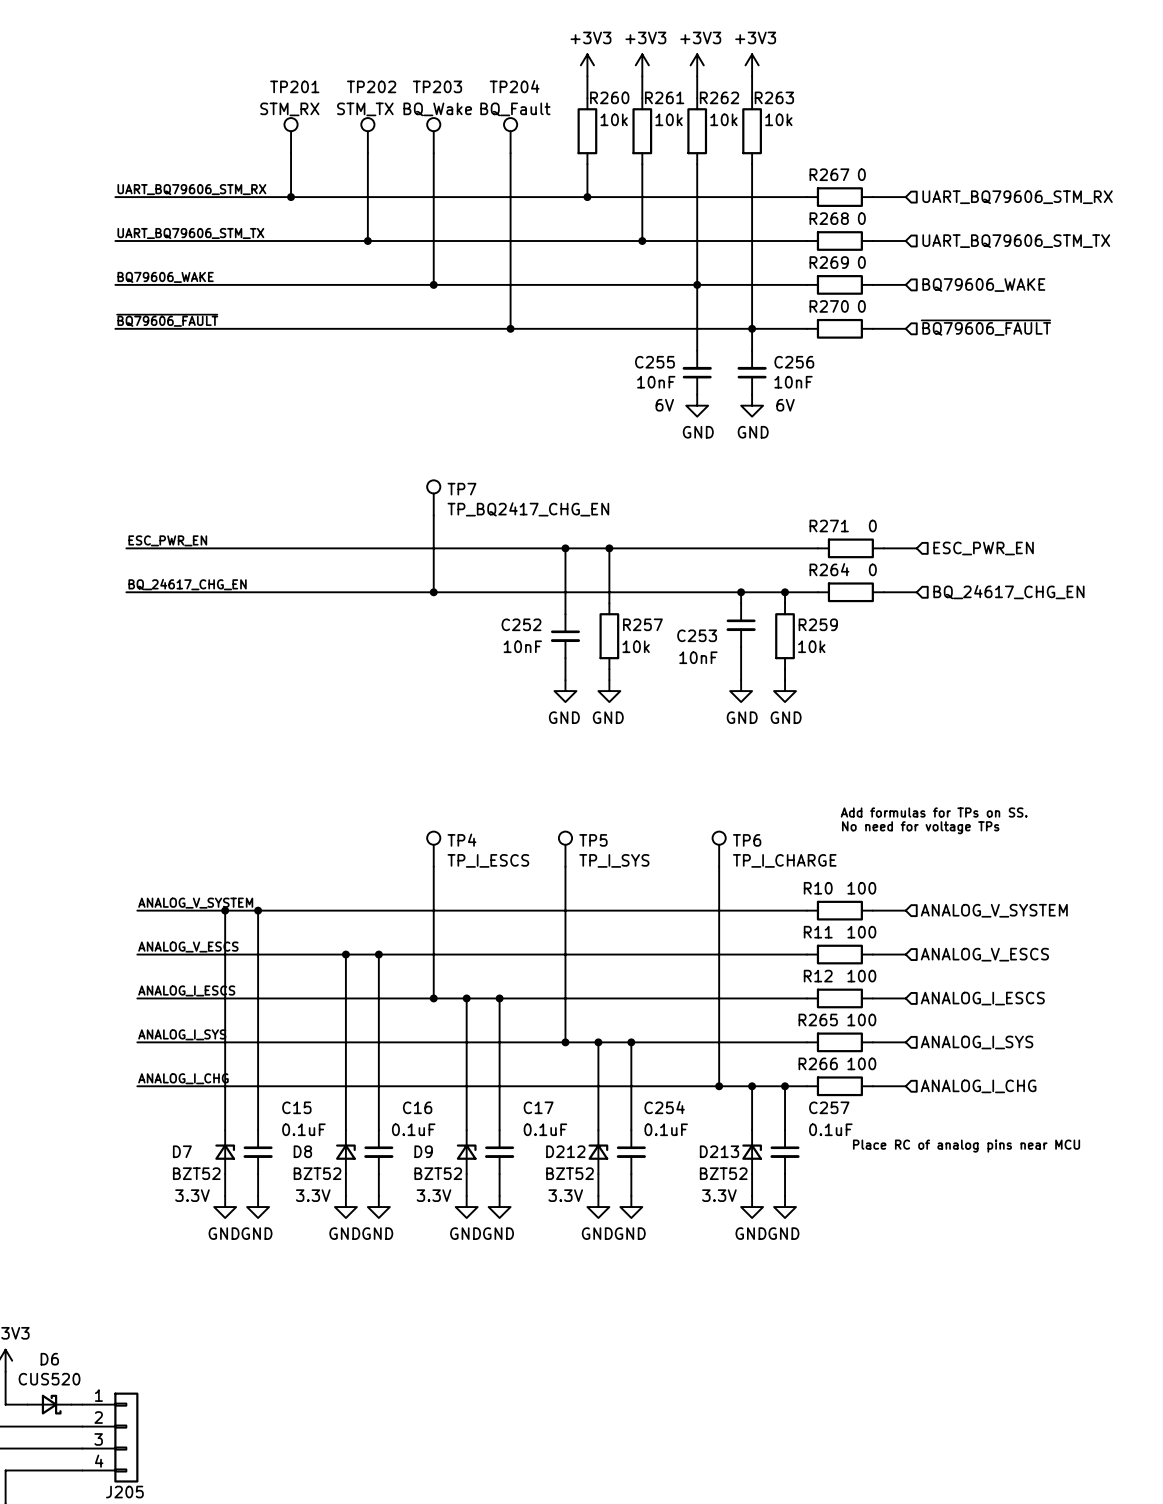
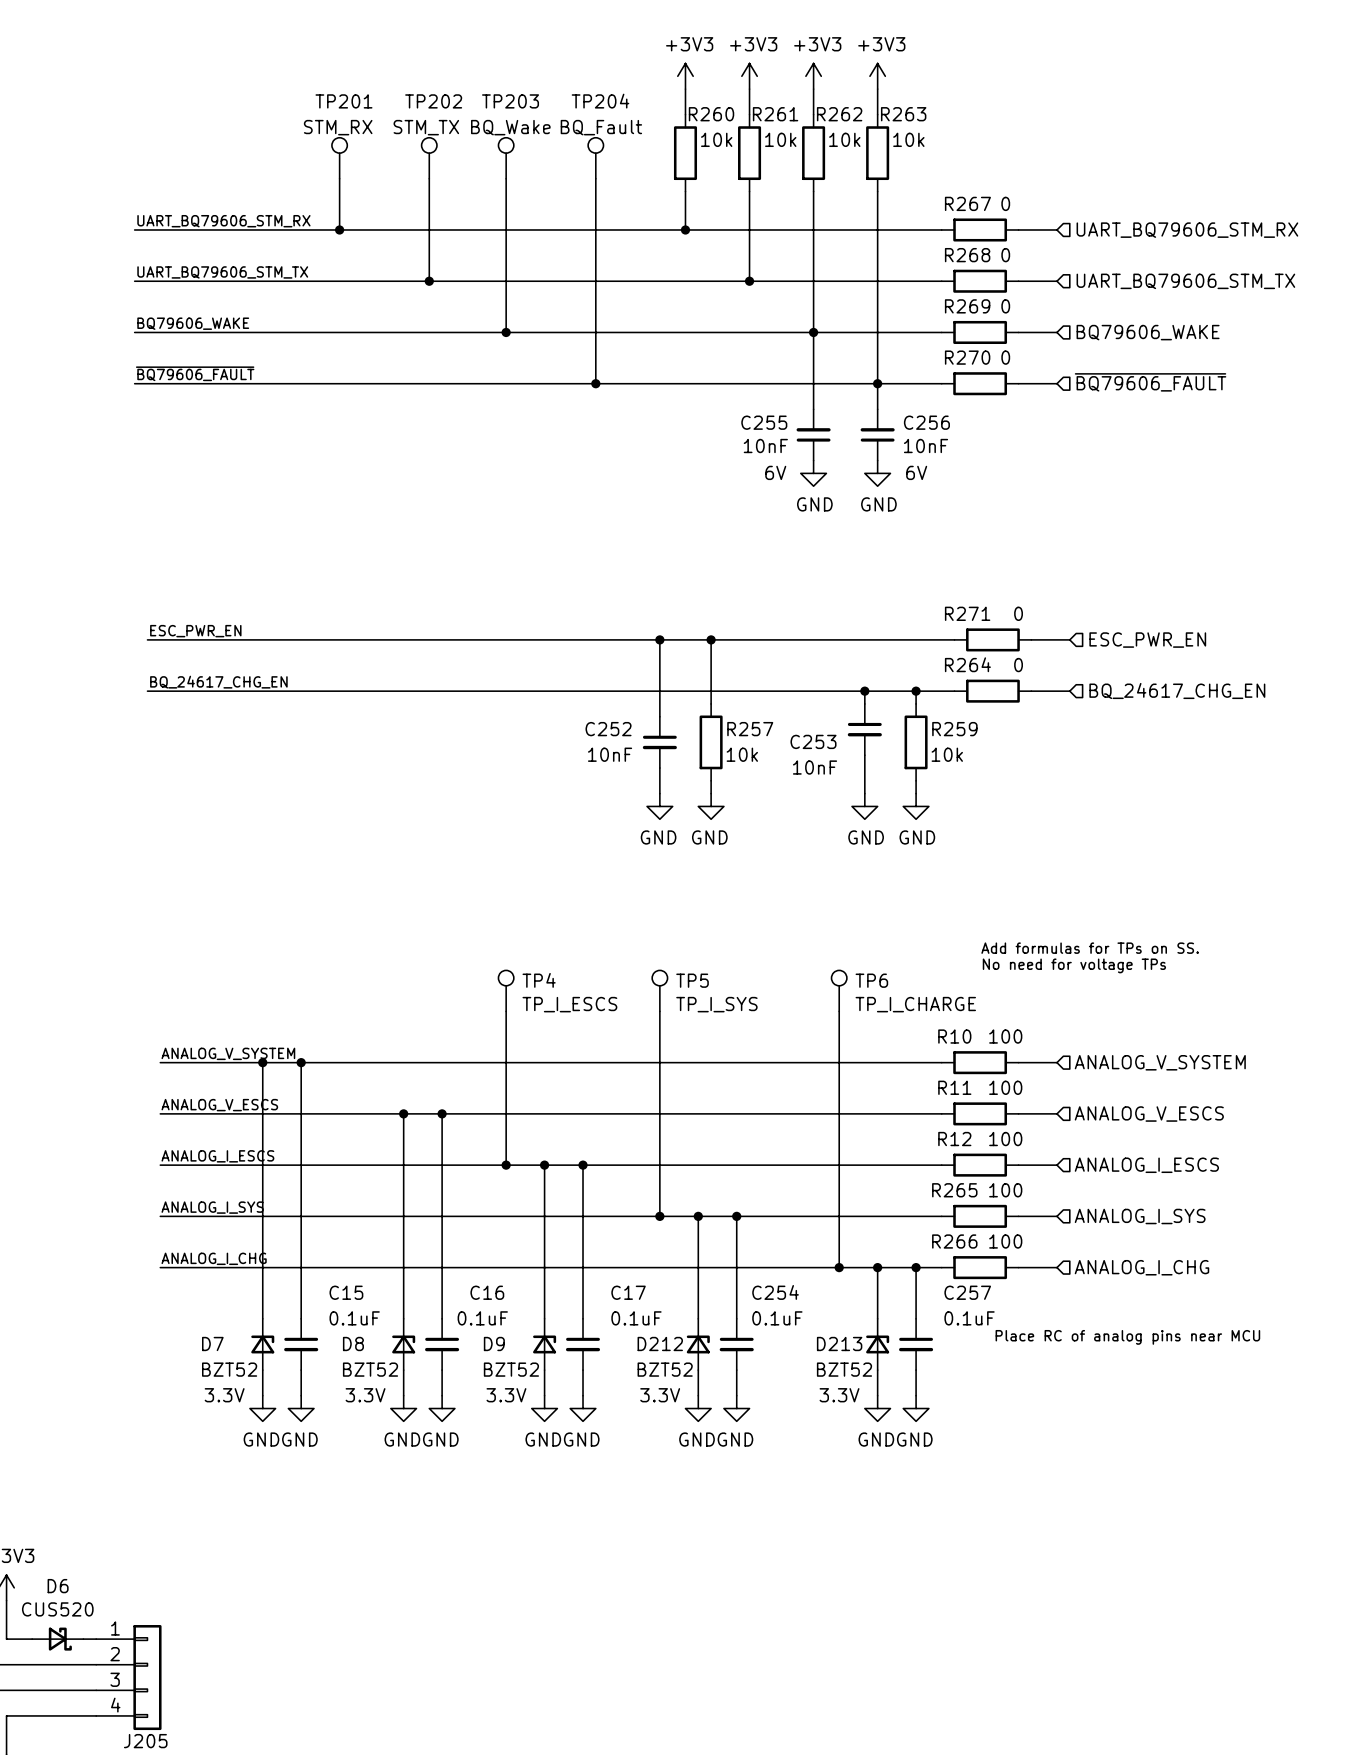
TP7: TP_BQ2417_CHG_EN (433, 497) -> none
wire: (433, 515) (433, 592) -> none
junction: (433, 592) -> none

